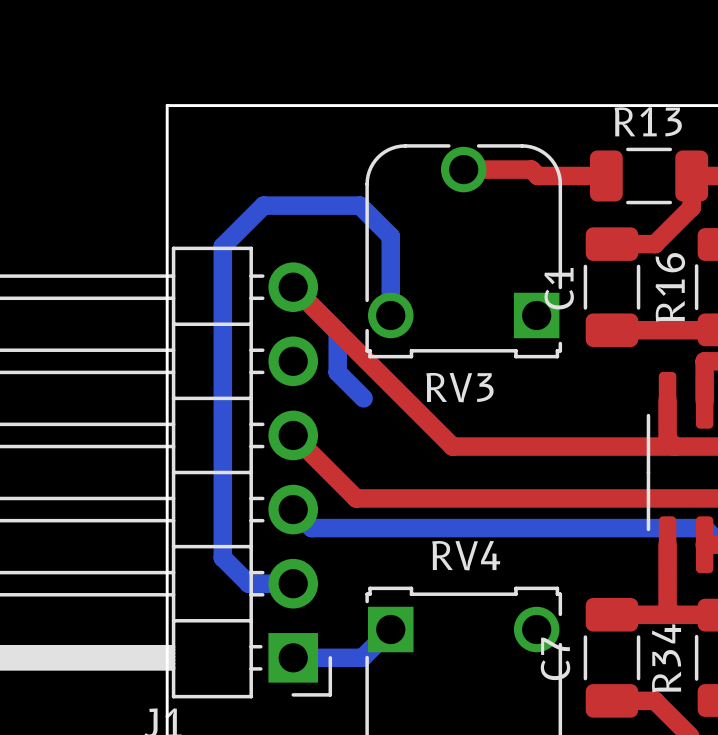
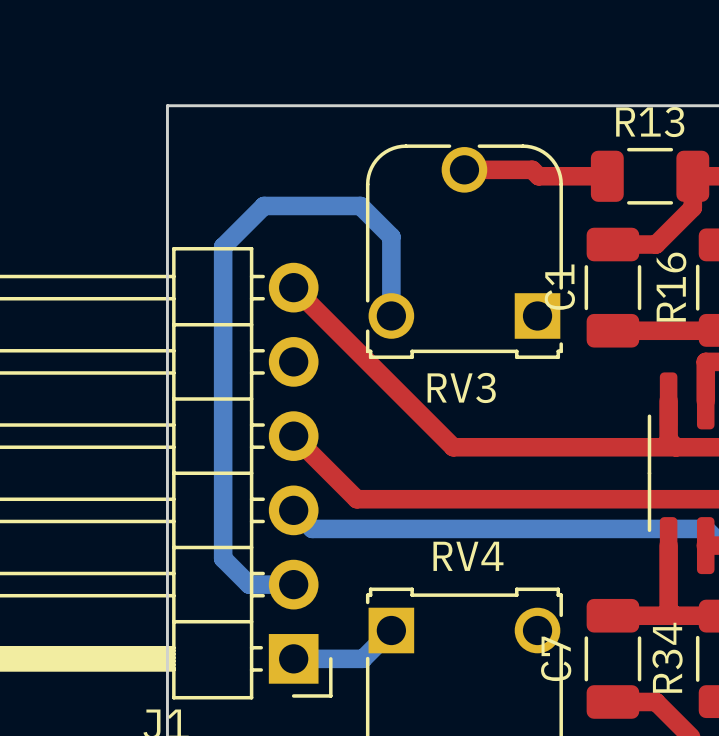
bottom track: (293, 287) (337, 331) (337, 372) (363, 398) -> none

